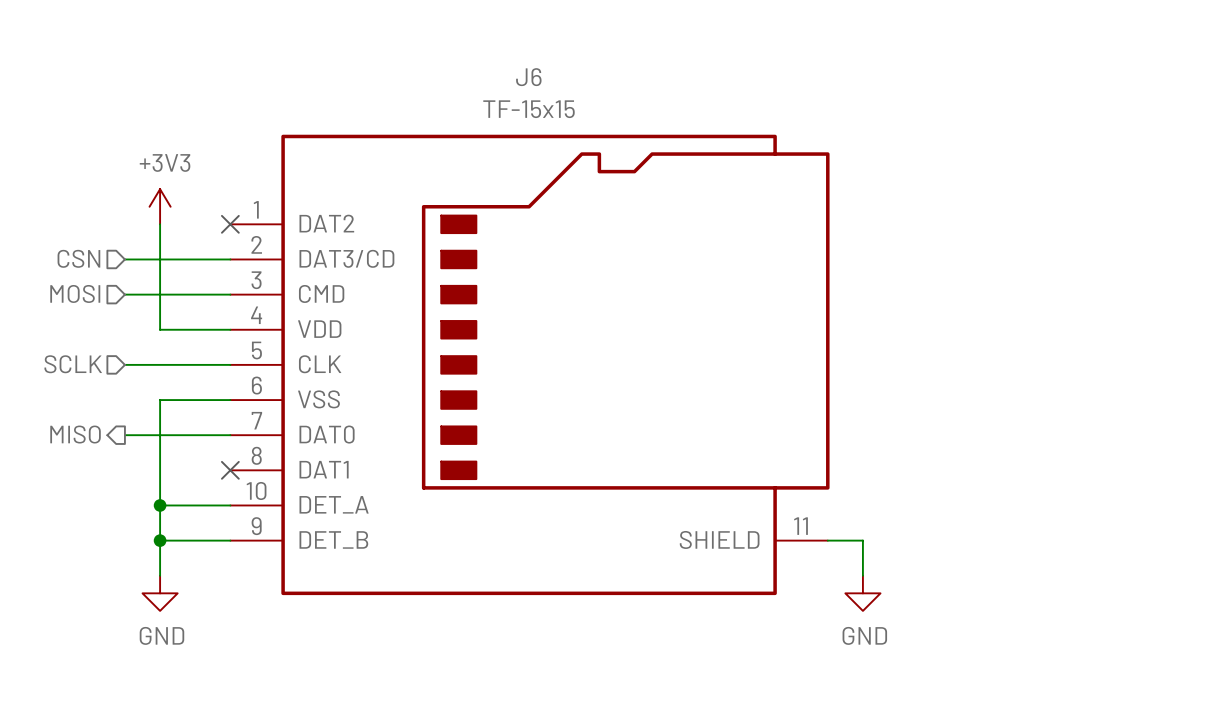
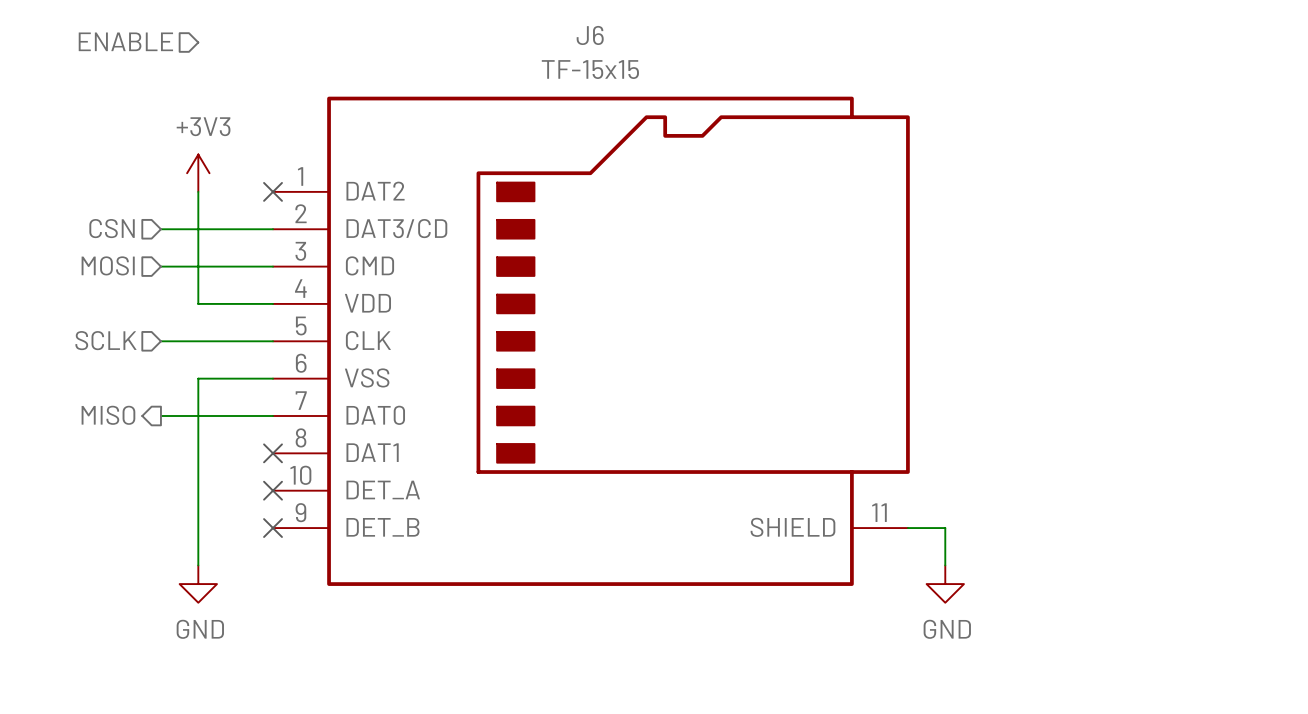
hierarchical label: none -> ENABLE (125, 41)
wire: (160, 505) (230, 505) -> none
junction: (160, 505) -> none
no-connect mark: none -> (273, 490)
wire: (160, 540) (230, 540) -> none
junction: (160, 540) -> none
no-connect mark: none -> (273, 528)

